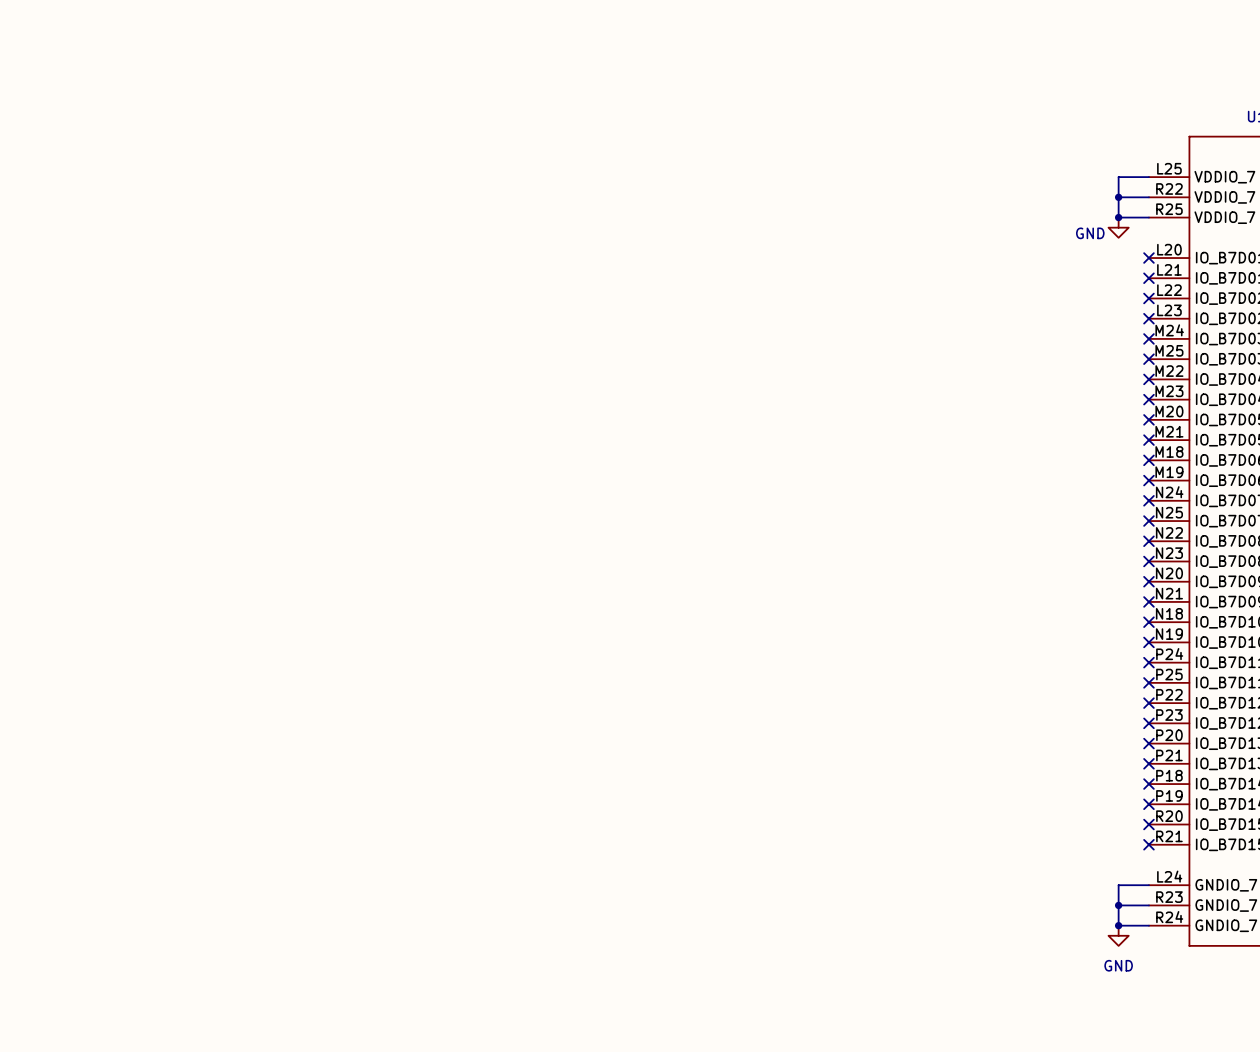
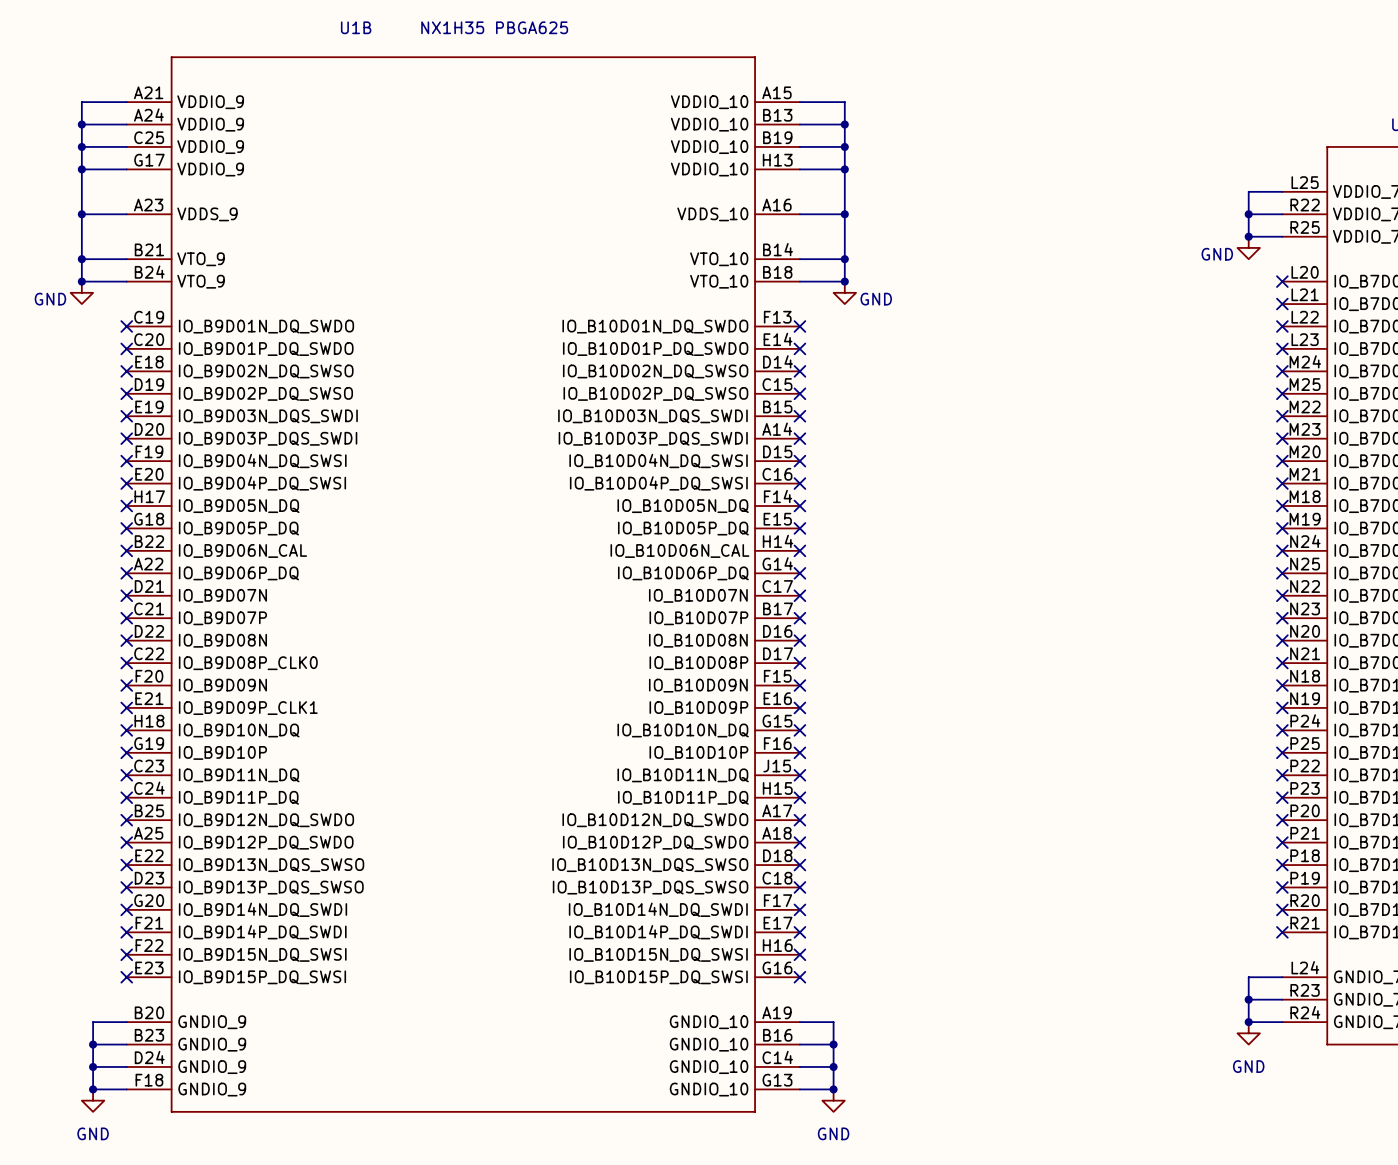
wire: none -> (126, 102) (81, 102) (81, 281) (126, 281)
wire: none -> (799, 102) (844, 102) (844, 281) (799, 281)
wire: none -> (81, 124) (126, 124)
junction: none -> (81, 124)
wire: none -> (799, 124) (844, 124)
junction: none -> (844, 124)
wire: none -> (81, 146) (126, 146)
junction: none -> (81, 146)
wire: none -> (799, 146) (844, 146)
junction: none -> (844, 146)
wire: none -> (81, 169) (126, 169)
junction: none -> (81, 169)
wire: none -> (799, 169) (844, 169)
junction: none -> (844, 169)
wire: none -> (81, 214) (126, 214)
junction: none -> (81, 214)
wire: none -> (799, 214) (844, 214)
junction: none -> (844, 214)
wire: none -> (81, 259) (126, 259)
junction: none -> (81, 259)
wire: none -> (799, 259) (844, 259)
junction: none -> (844, 259)
junction: none -> (81, 281)
junction: none -> (844, 281)
power symbol: none -> GND (81, 292)
power symbol: none -> GND (844, 292)
no-connect mark: none -> (126, 326)
no-connect mark: none -> (799, 326)
no-connect mark: none -> (126, 348)
no-connect mark: none -> (799, 348)
no-connect mark: none -> (126, 371)
no-connect mark: none -> (799, 371)
no-connect mark: none -> (126, 393)
no-connect mark: none -> (799, 393)
no-connect mark: none -> (126, 416)
no-connect mark: none -> (799, 416)
no-connect mark: none -> (126, 438)
no-connect mark: none -> (799, 438)
no-connect mark: none -> (126, 461)
no-connect mark: none -> (799, 461)
no-connect mark: none -> (126, 483)
no-connect mark: none -> (799, 483)
no-connect mark: none -> (126, 506)
no-connect mark: none -> (799, 506)
no-connect mark: none -> (126, 528)
no-connect mark: none -> (799, 528)
no-connect mark: none -> (126, 550)
no-connect mark: none -> (799, 550)
no-connect mark: none -> (126, 573)
no-connect mark: none -> (799, 573)
U1B: none -> NX1H35 PBGA625 (463, 584)
no-connect mark: none -> (126, 595)
no-connect mark: none -> (799, 595)
no-connect mark: none -> (126, 618)
no-connect mark: none -> (799, 618)
no-connect mark: none -> (126, 640)
no-connect mark: none -> (799, 640)
no-connect mark: none -> (126, 663)
no-connect mark: none -> (799, 663)
no-connect mark: none -> (126, 685)
no-connect mark: none -> (799, 685)
no-connect mark: none -> (126, 707)
no-connect mark: none -> (799, 707)
no-connect mark: none -> (126, 730)
no-connect mark: none -> (799, 730)
no-connect mark: none -> (126, 752)
no-connect mark: none -> (799, 752)
no-connect mark: none -> (126, 775)
no-connect mark: none -> (799, 775)
no-connect mark: none -> (126, 797)
no-connect mark: none -> (799, 797)
no-connect mark: none -> (126, 820)
no-connect mark: none -> (799, 820)
no-connect mark: none -> (126, 842)
no-connect mark: none -> (799, 842)
no-connect mark: none -> (126, 865)
no-connect mark: none -> (799, 865)
no-connect mark: none -> (126, 887)
no-connect mark: none -> (799, 887)
no-connect mark: none -> (126, 909)
no-connect mark: none -> (799, 909)
no-connect mark: none -> (126, 932)
no-connect mark: none -> (799, 932)
no-connect mark: none -> (126, 954)
no-connect mark: none -> (799, 954)
no-connect mark: none -> (126, 977)
no-connect mark: none -> (799, 977)
wire: none -> (126, 1022) (93, 1022) (93, 1089) (126, 1089)
wire: none -> (799, 1022) (833, 1022) (833, 1089) (799, 1089)
wire: none -> (93, 1044) (126, 1044)
junction: none -> (93, 1044)
wire: none -> (799, 1044) (833, 1044)
junction: none -> (833, 1044)
wire: none -> (93, 1066) (126, 1066)
junction: none -> (93, 1066)
wire: none -> (799, 1066) (833, 1066)
junction: none -> (833, 1066)
junction: none -> (93, 1089)
junction: none -> (833, 1089)
power symbol: none -> GND (93, 1100)
power symbol: none -> GND (833, 1100)

